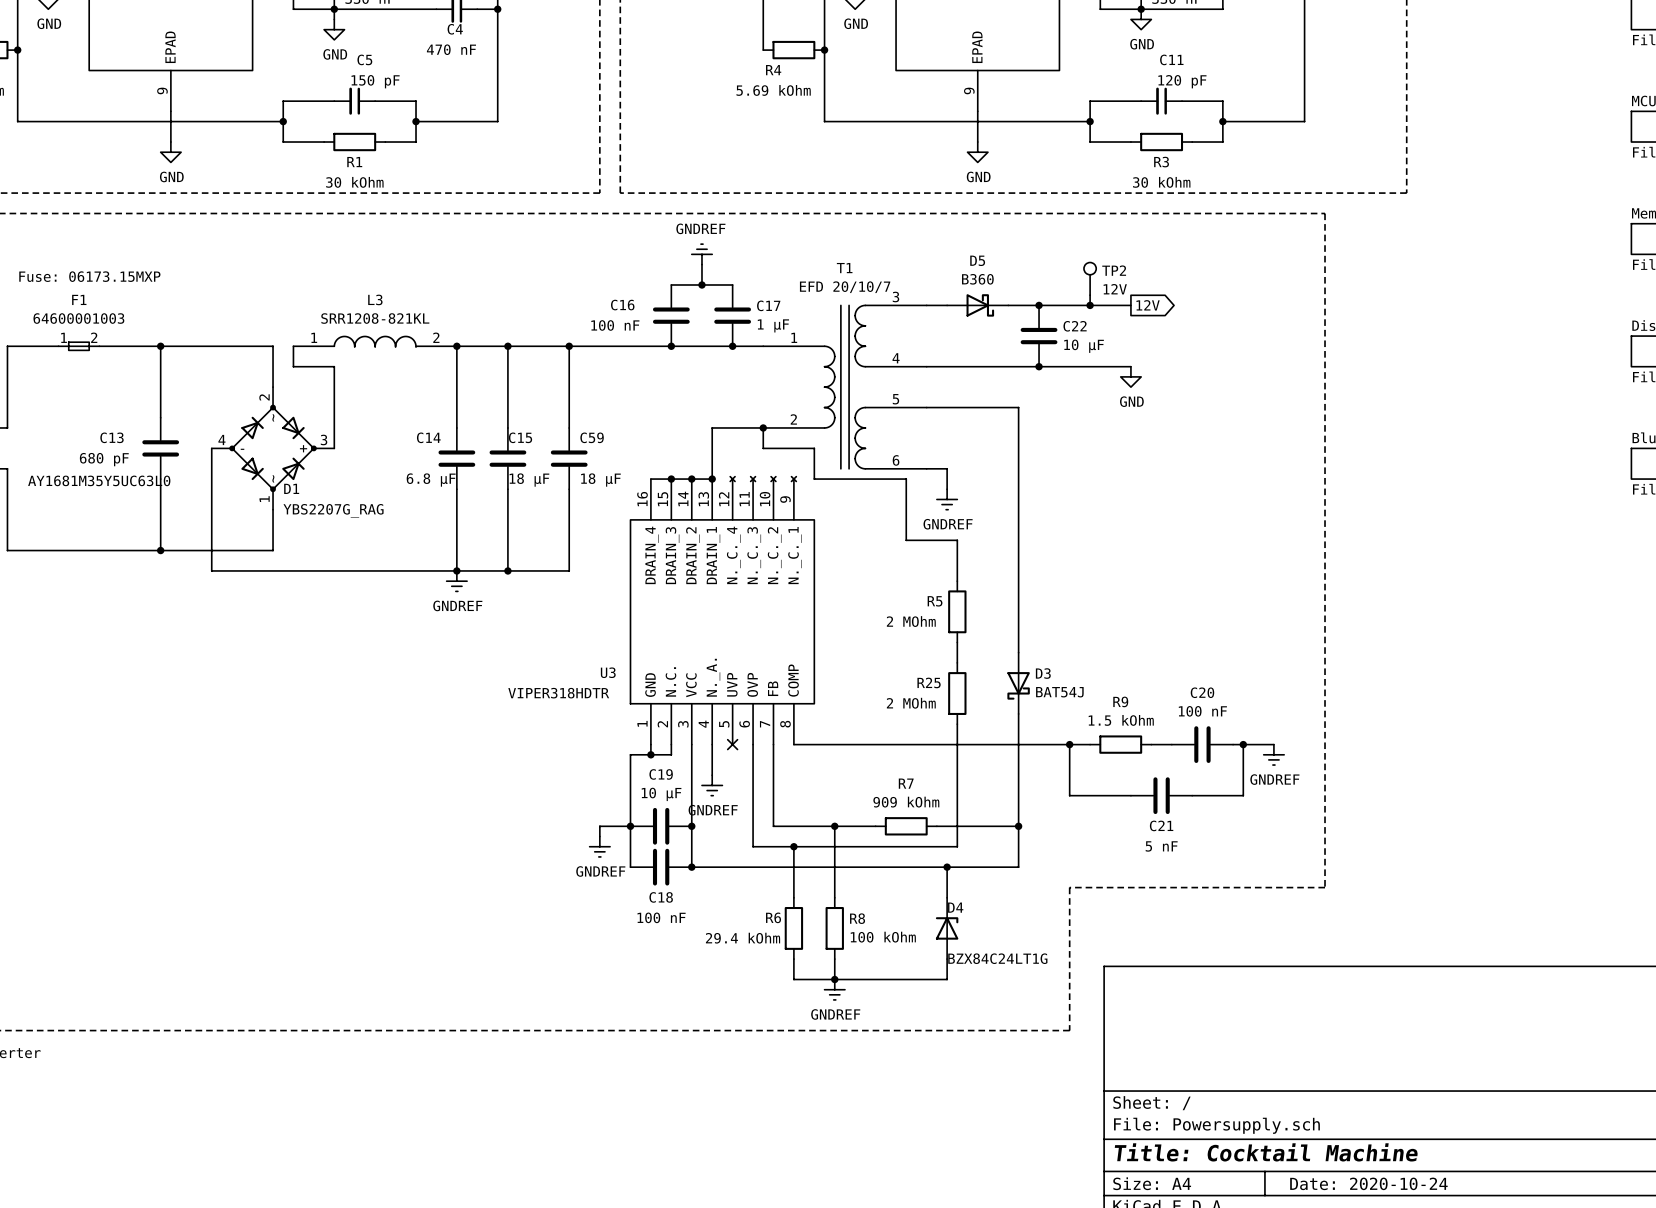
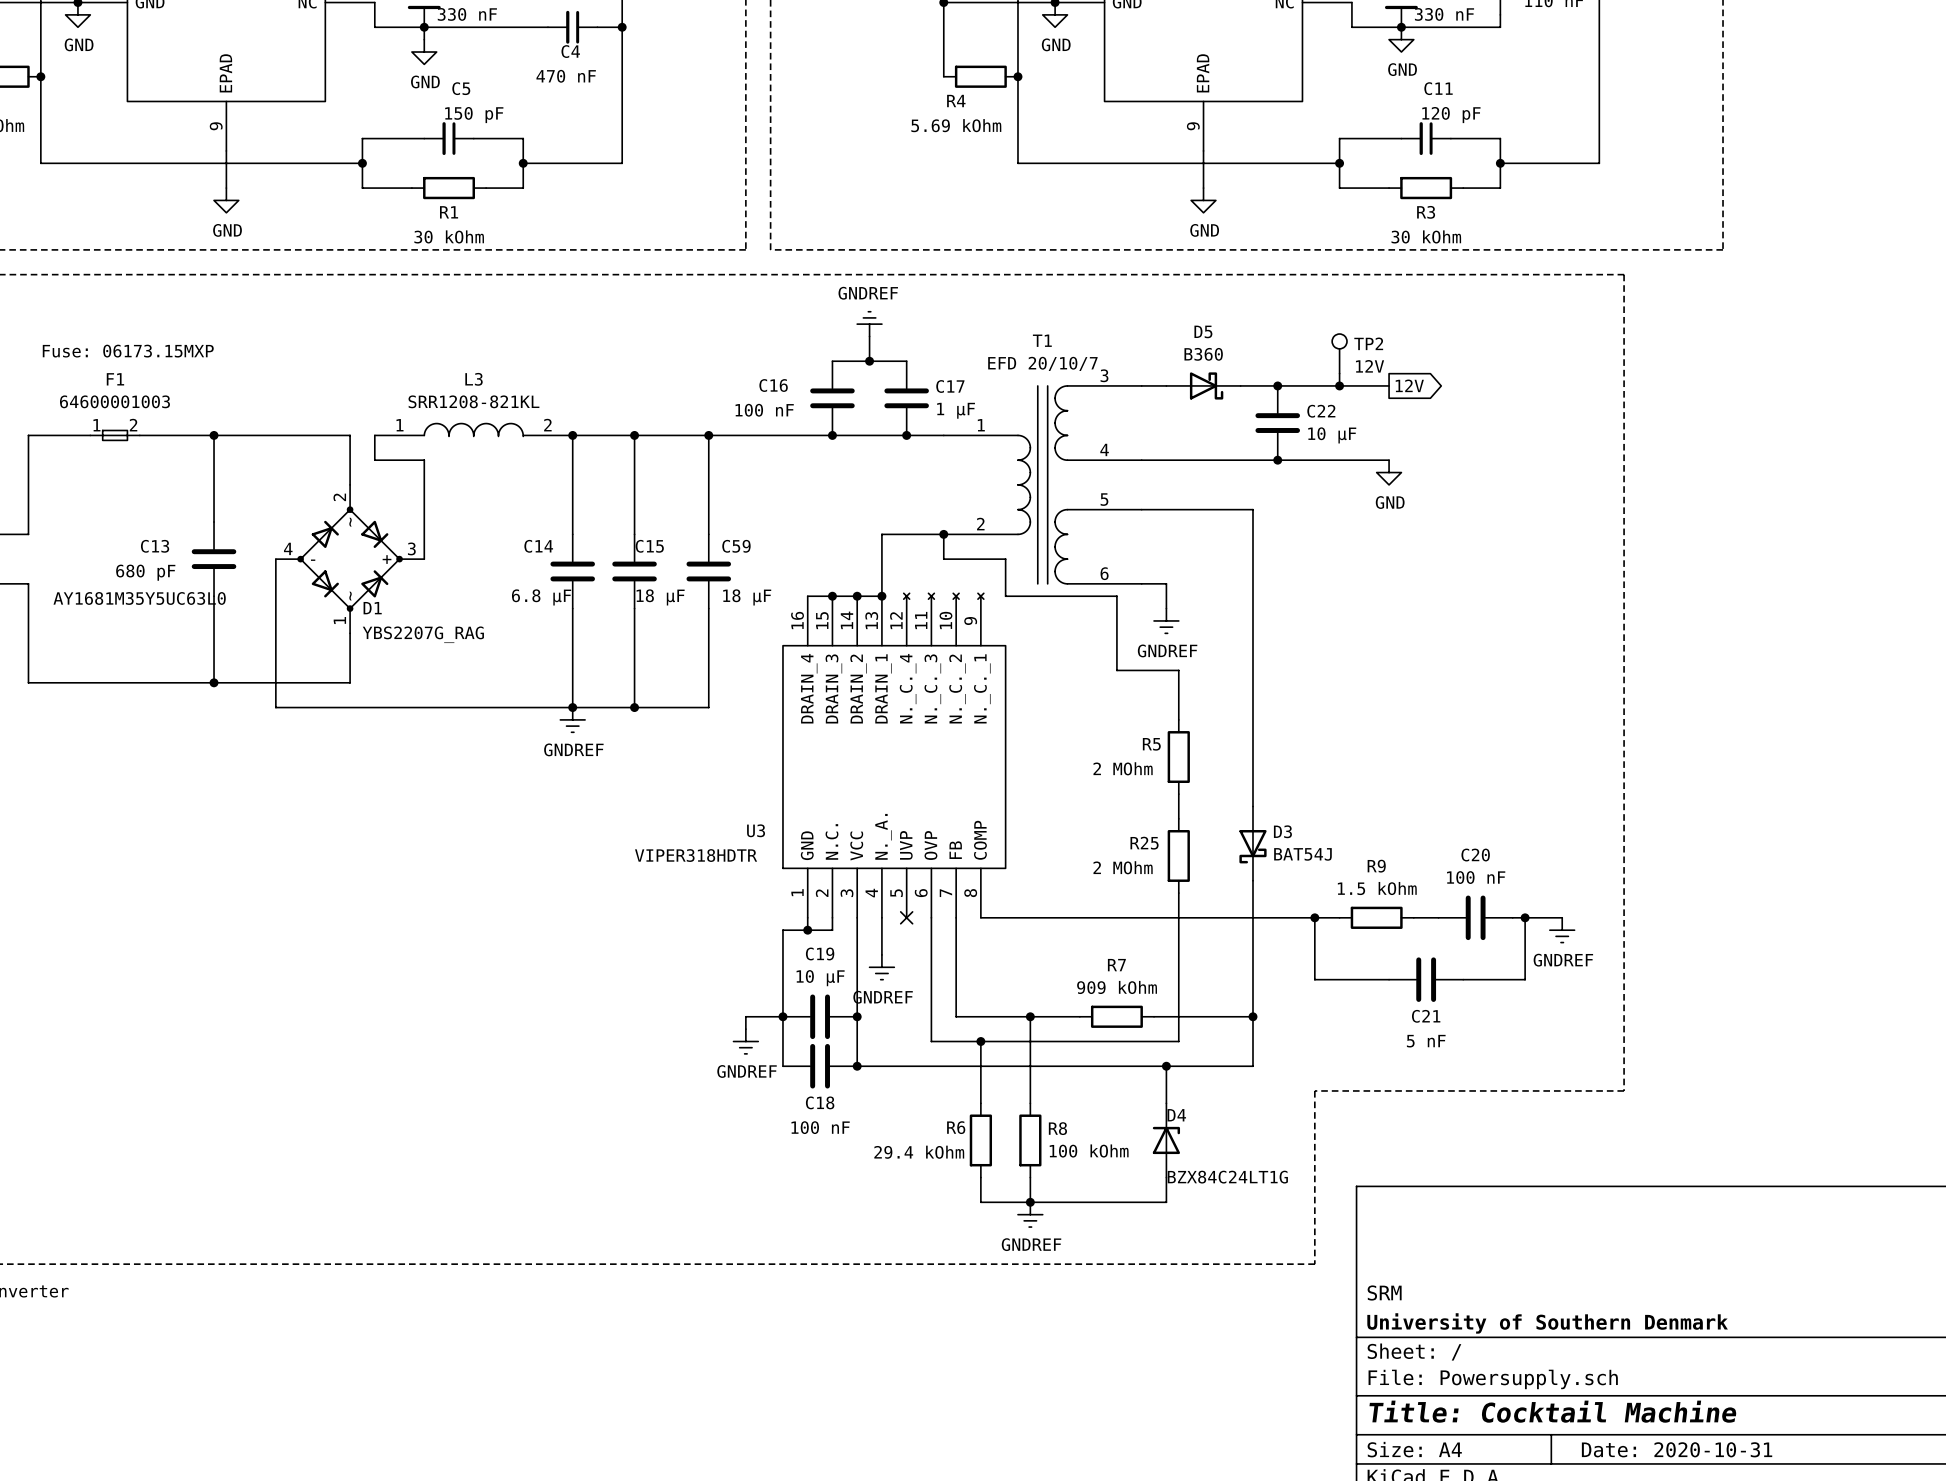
title block: none -> SRM (1384, 1293)
title block: none -> University of Southern Denmark (1547, 1323)
title block: Date: 2020-10-24 (1368, 1183) -> Date: 2020-10-31 (1677, 1449)

